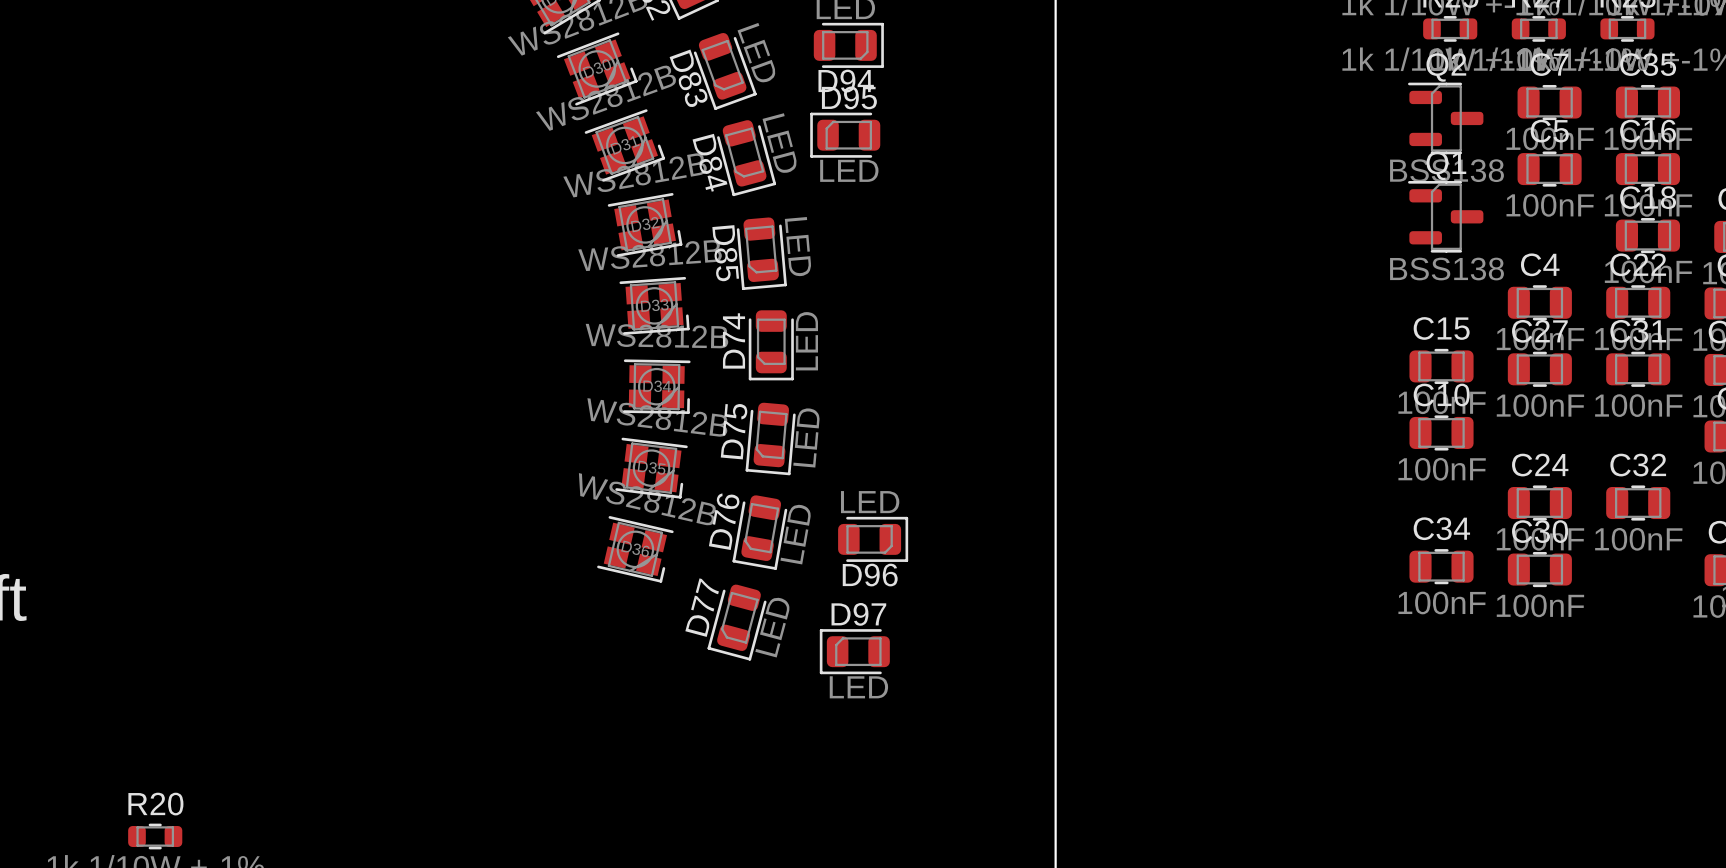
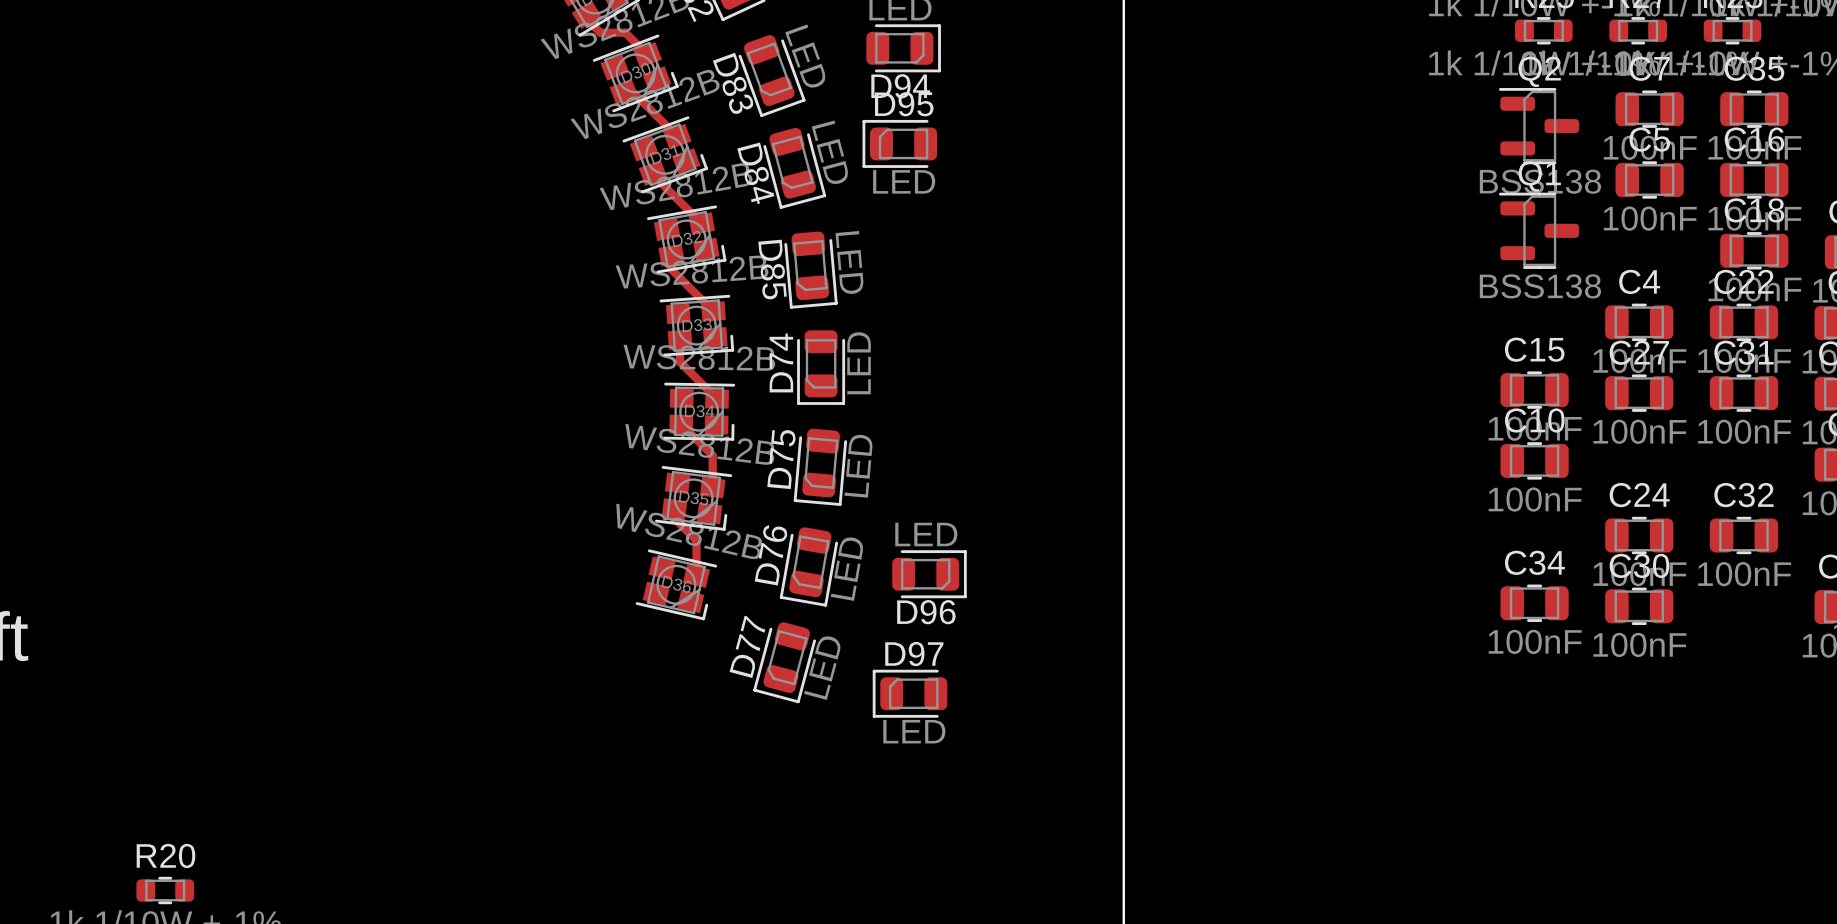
track: none -> (586, 14) (586, 19) (600, 32) (625, 32) (647, 55)
track: none -> (623, 91) (632, 91) (677, 136)
track: none -> (653, 173) (701, 223)
track: none -> (671, 255) (671, 269) (713, 311)
track: none -> (680, 339) (680, 362) (717, 399)
track: none -> (681, 424) (712, 455) (712, 487)
track: none -> (674, 509) (674, 518) (696, 540) (696, 576)

